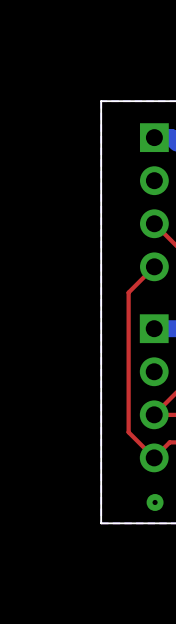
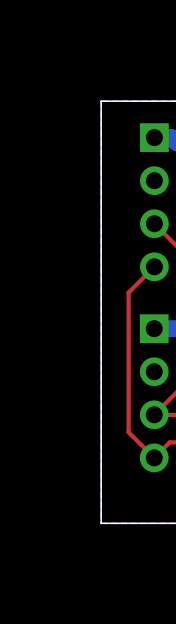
via: (155, 502) -> none

